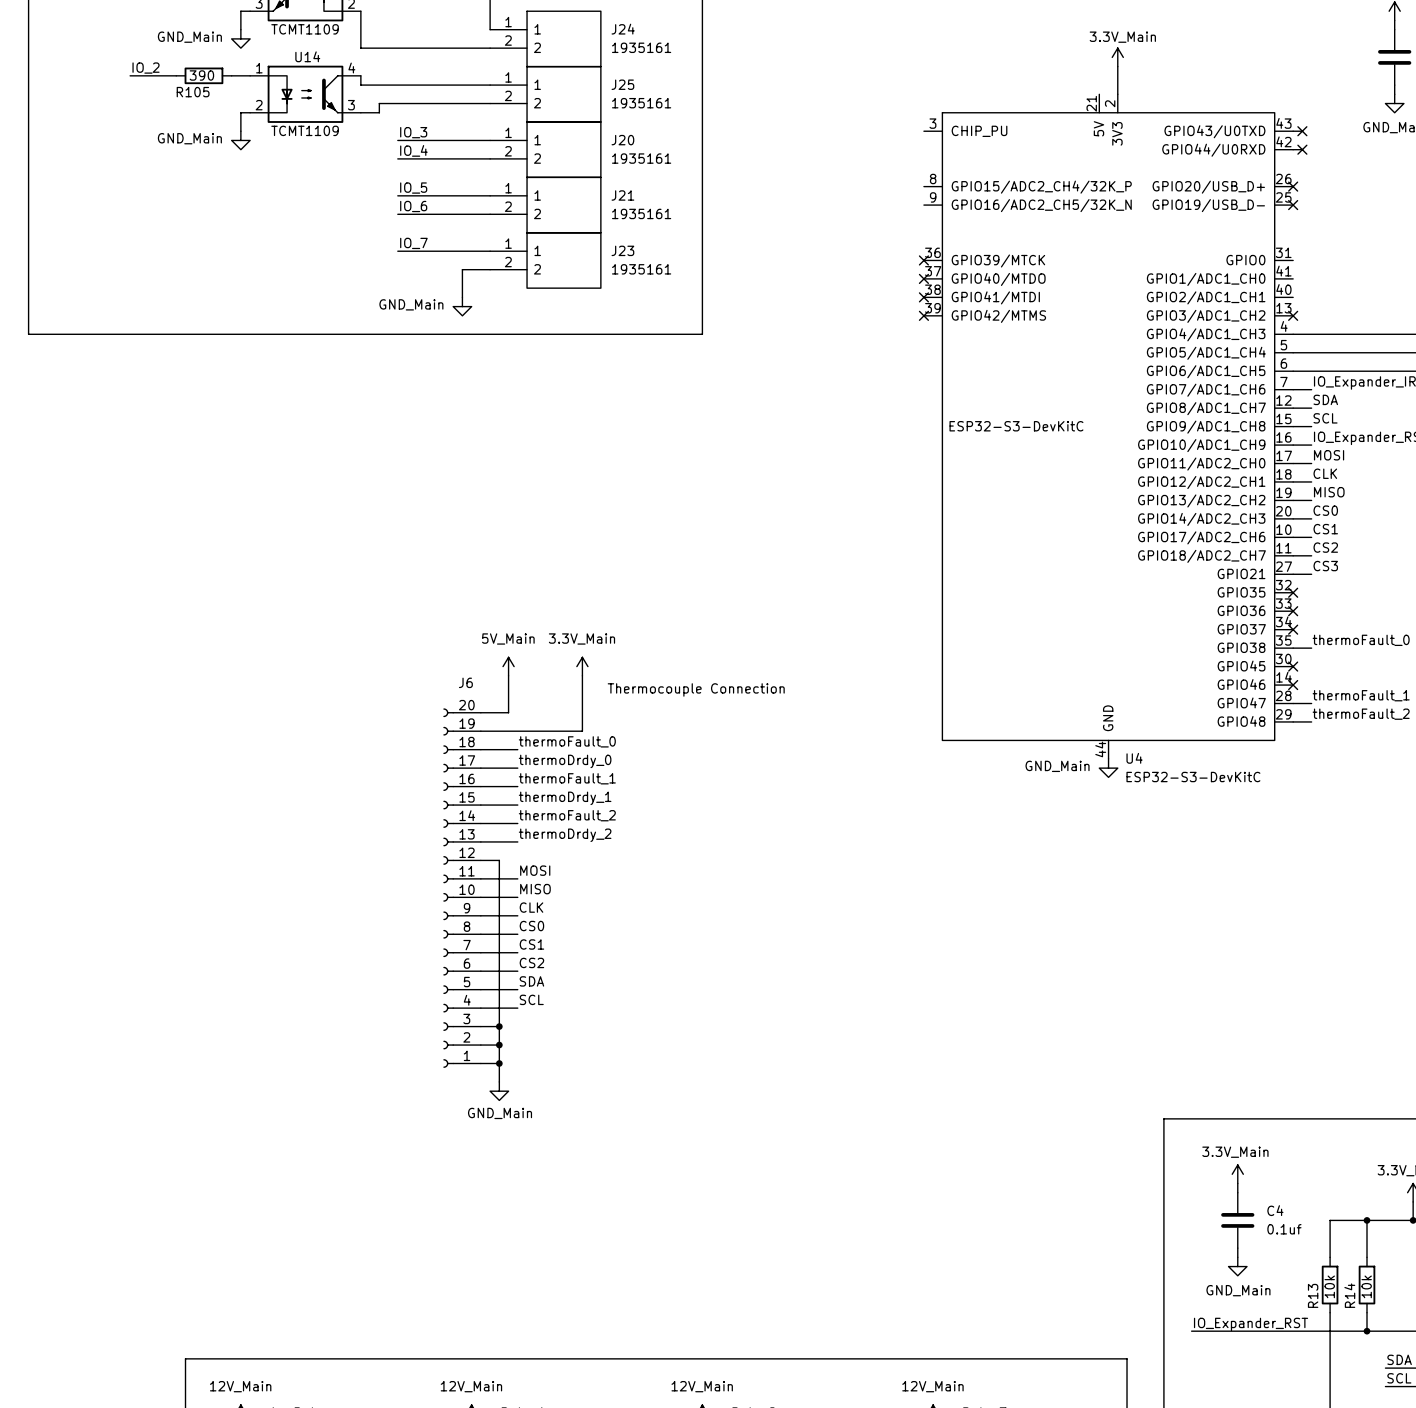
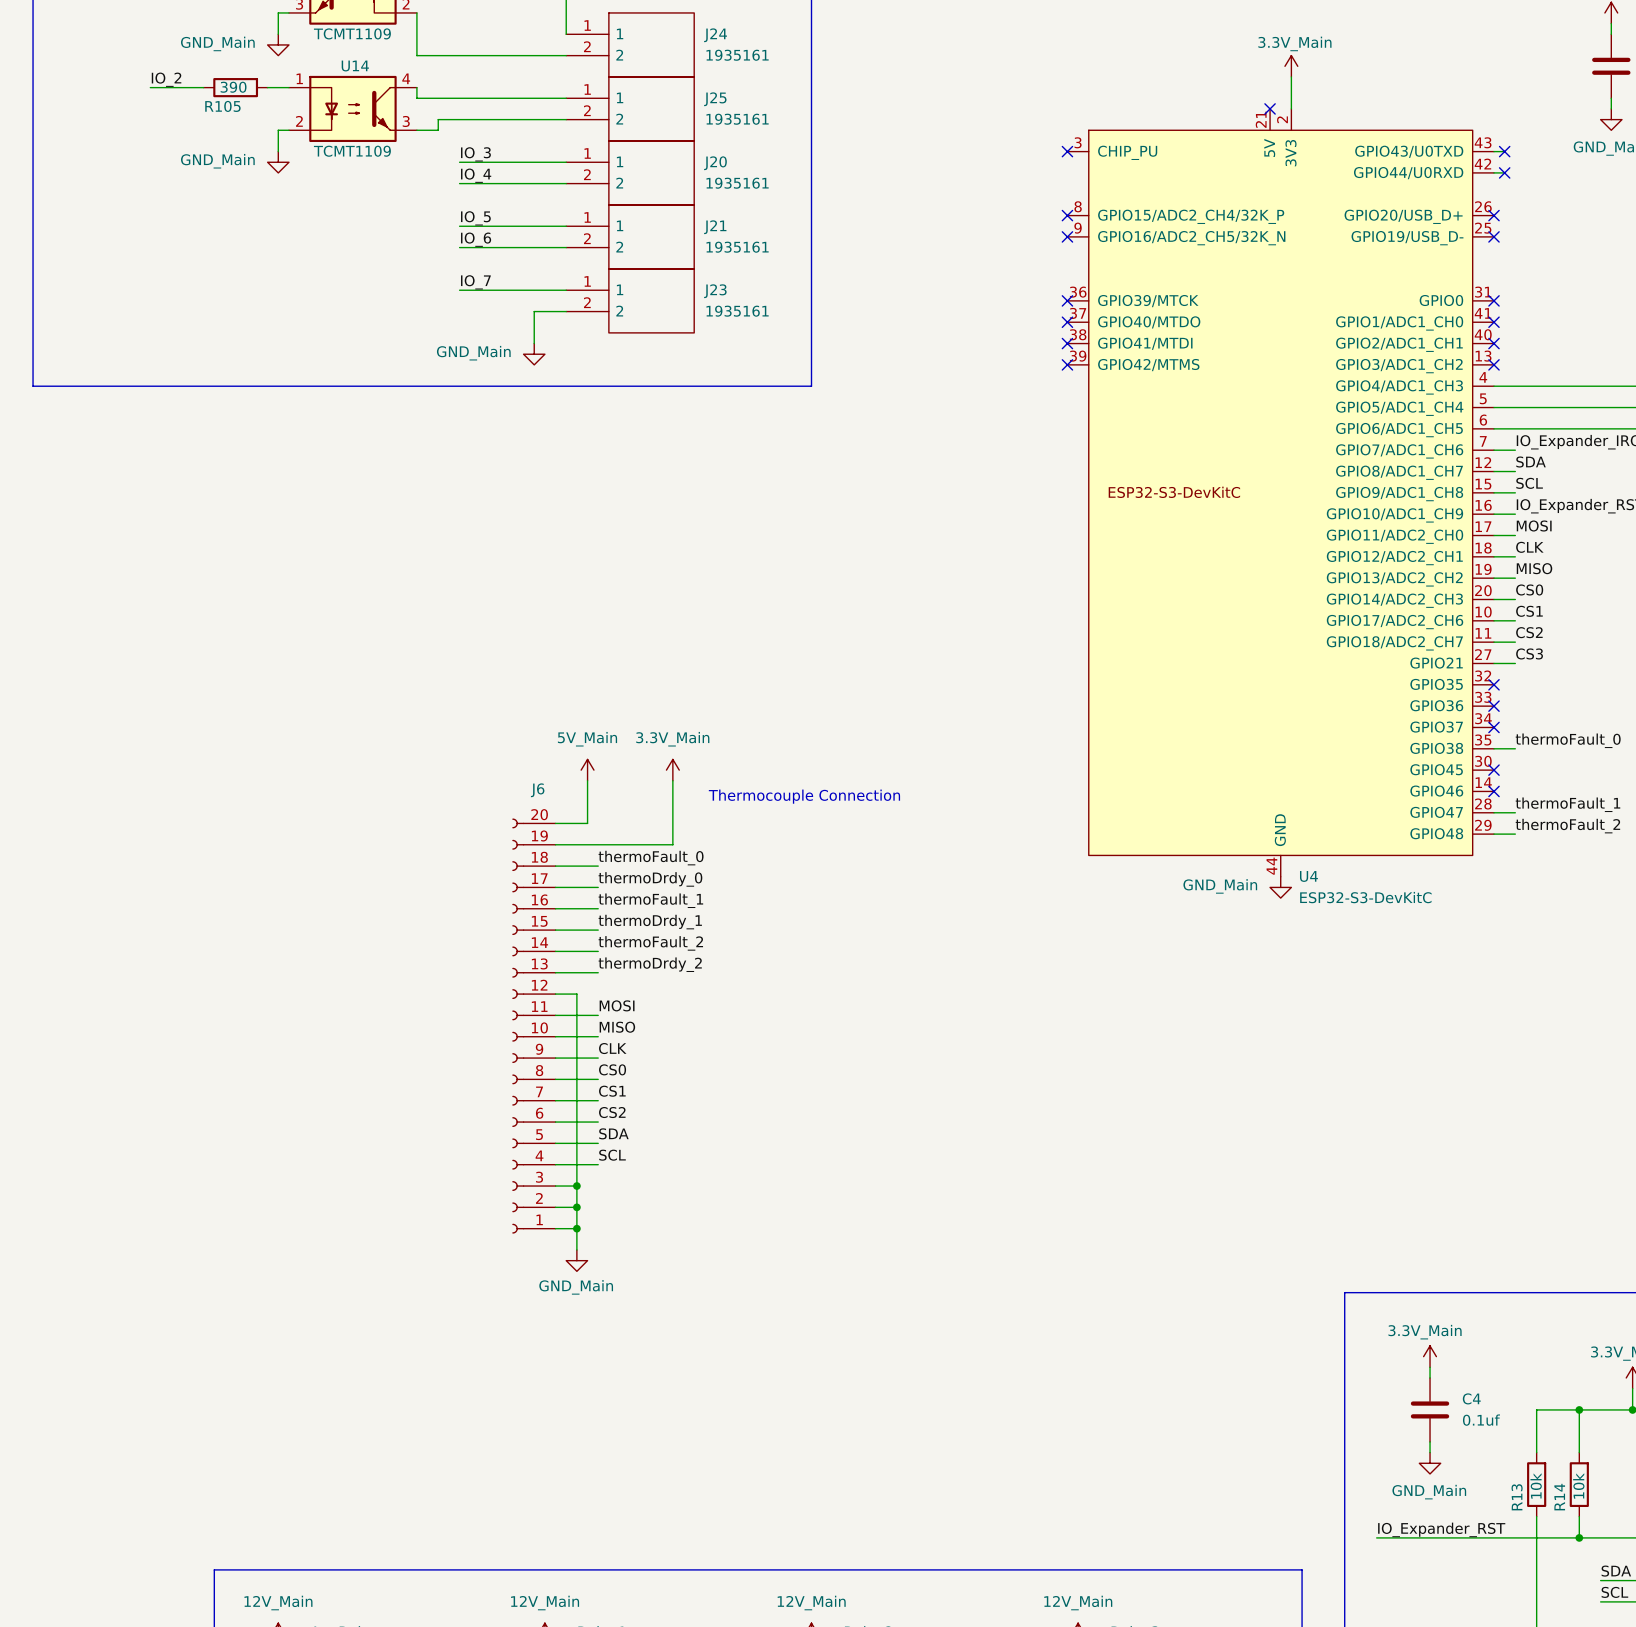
no-connect mark: none -> (1270, 108)
no-connect mark: none -> (1067, 151)
no-connect mark: none -> (1067, 215)
no-connect mark: none -> (1067, 236)
no-connect mark: none -> (1494, 300)
no-connect mark: none -> (1494, 322)
no-connect mark: none -> (1494, 343)

